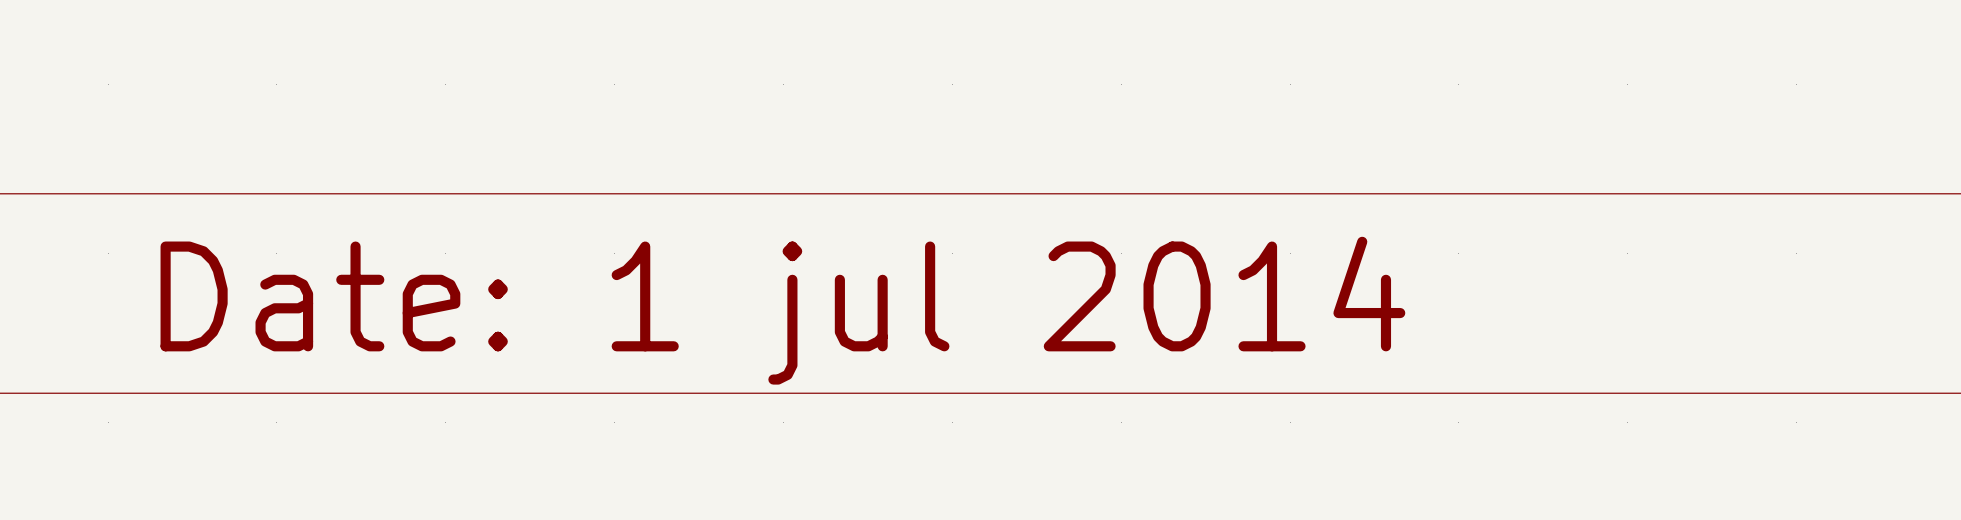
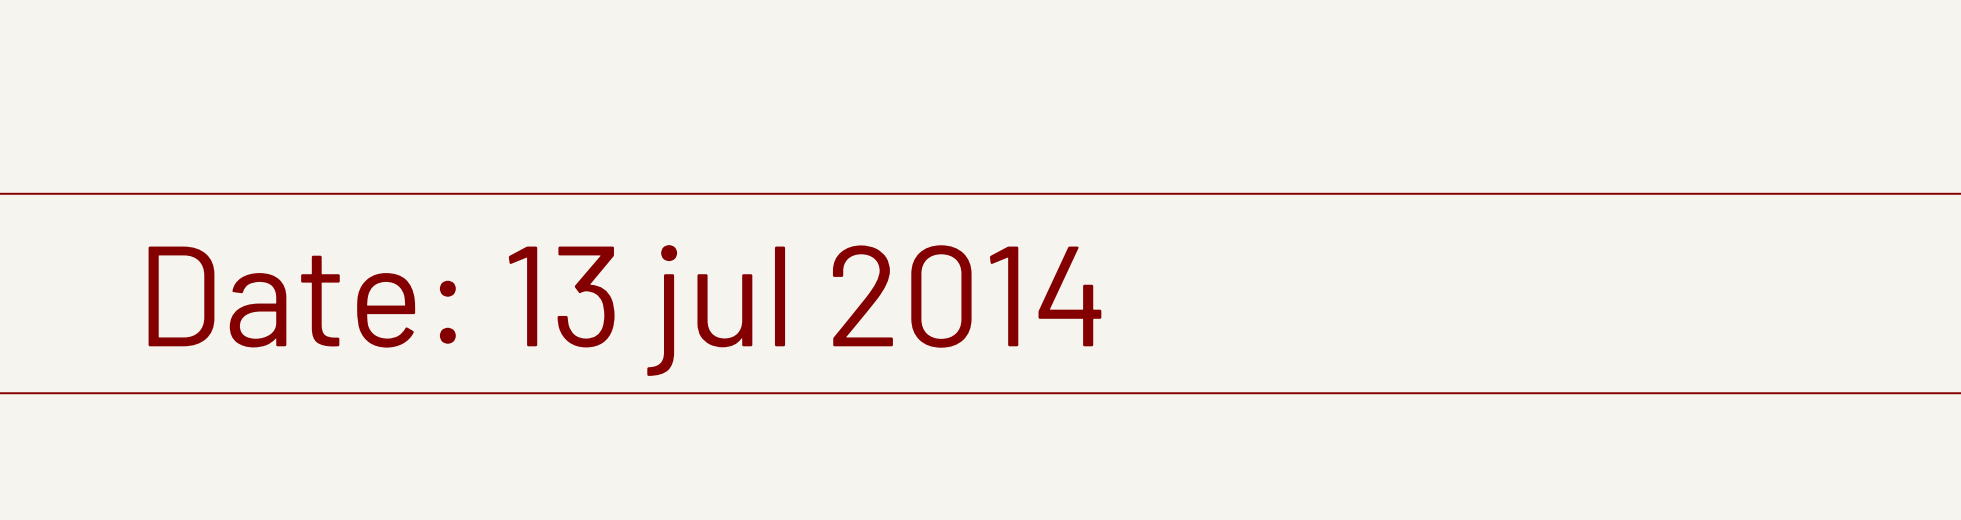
title block: Date: 1 jul 2014 (782, 310) -> Date: 13 jul 2014 (624, 310)

